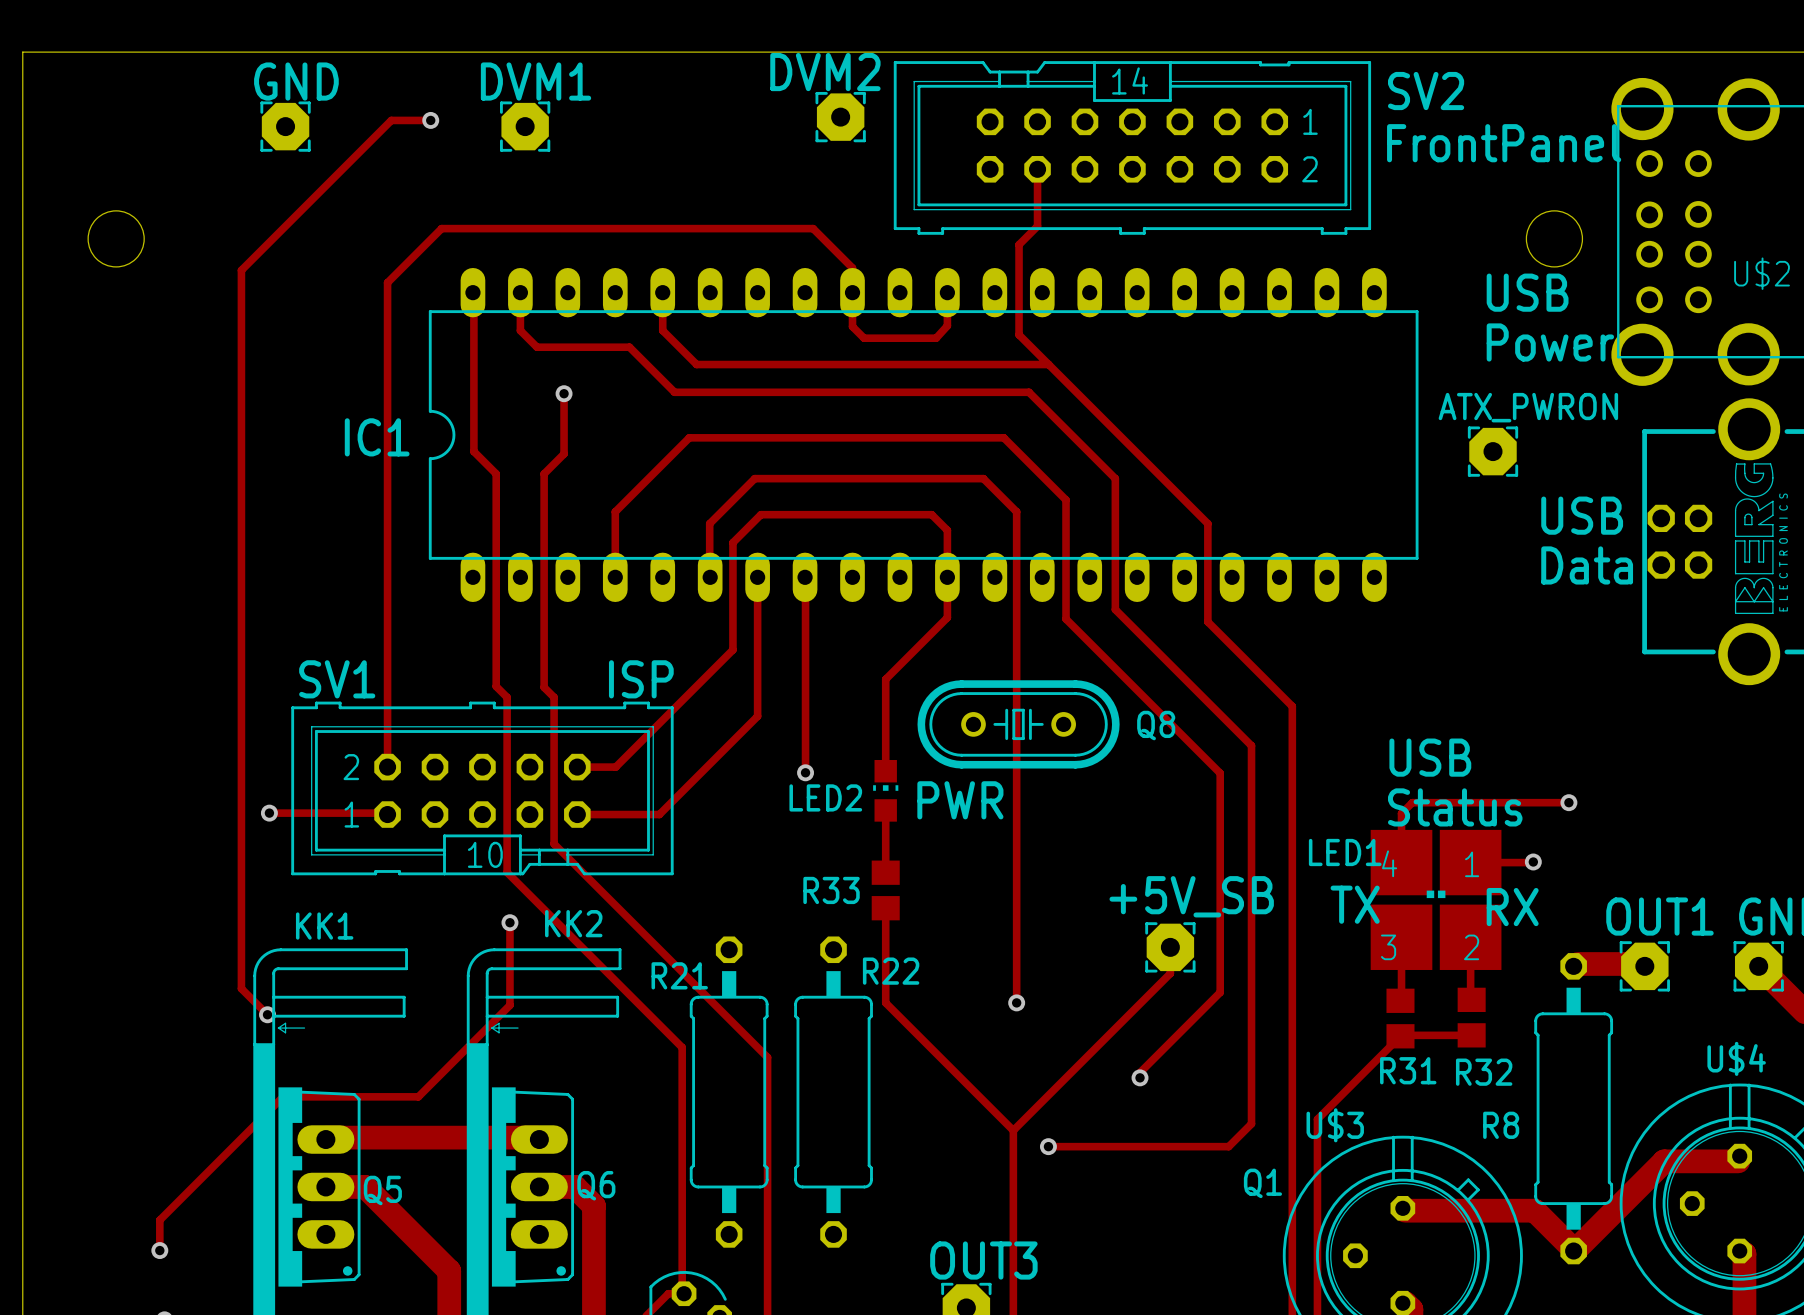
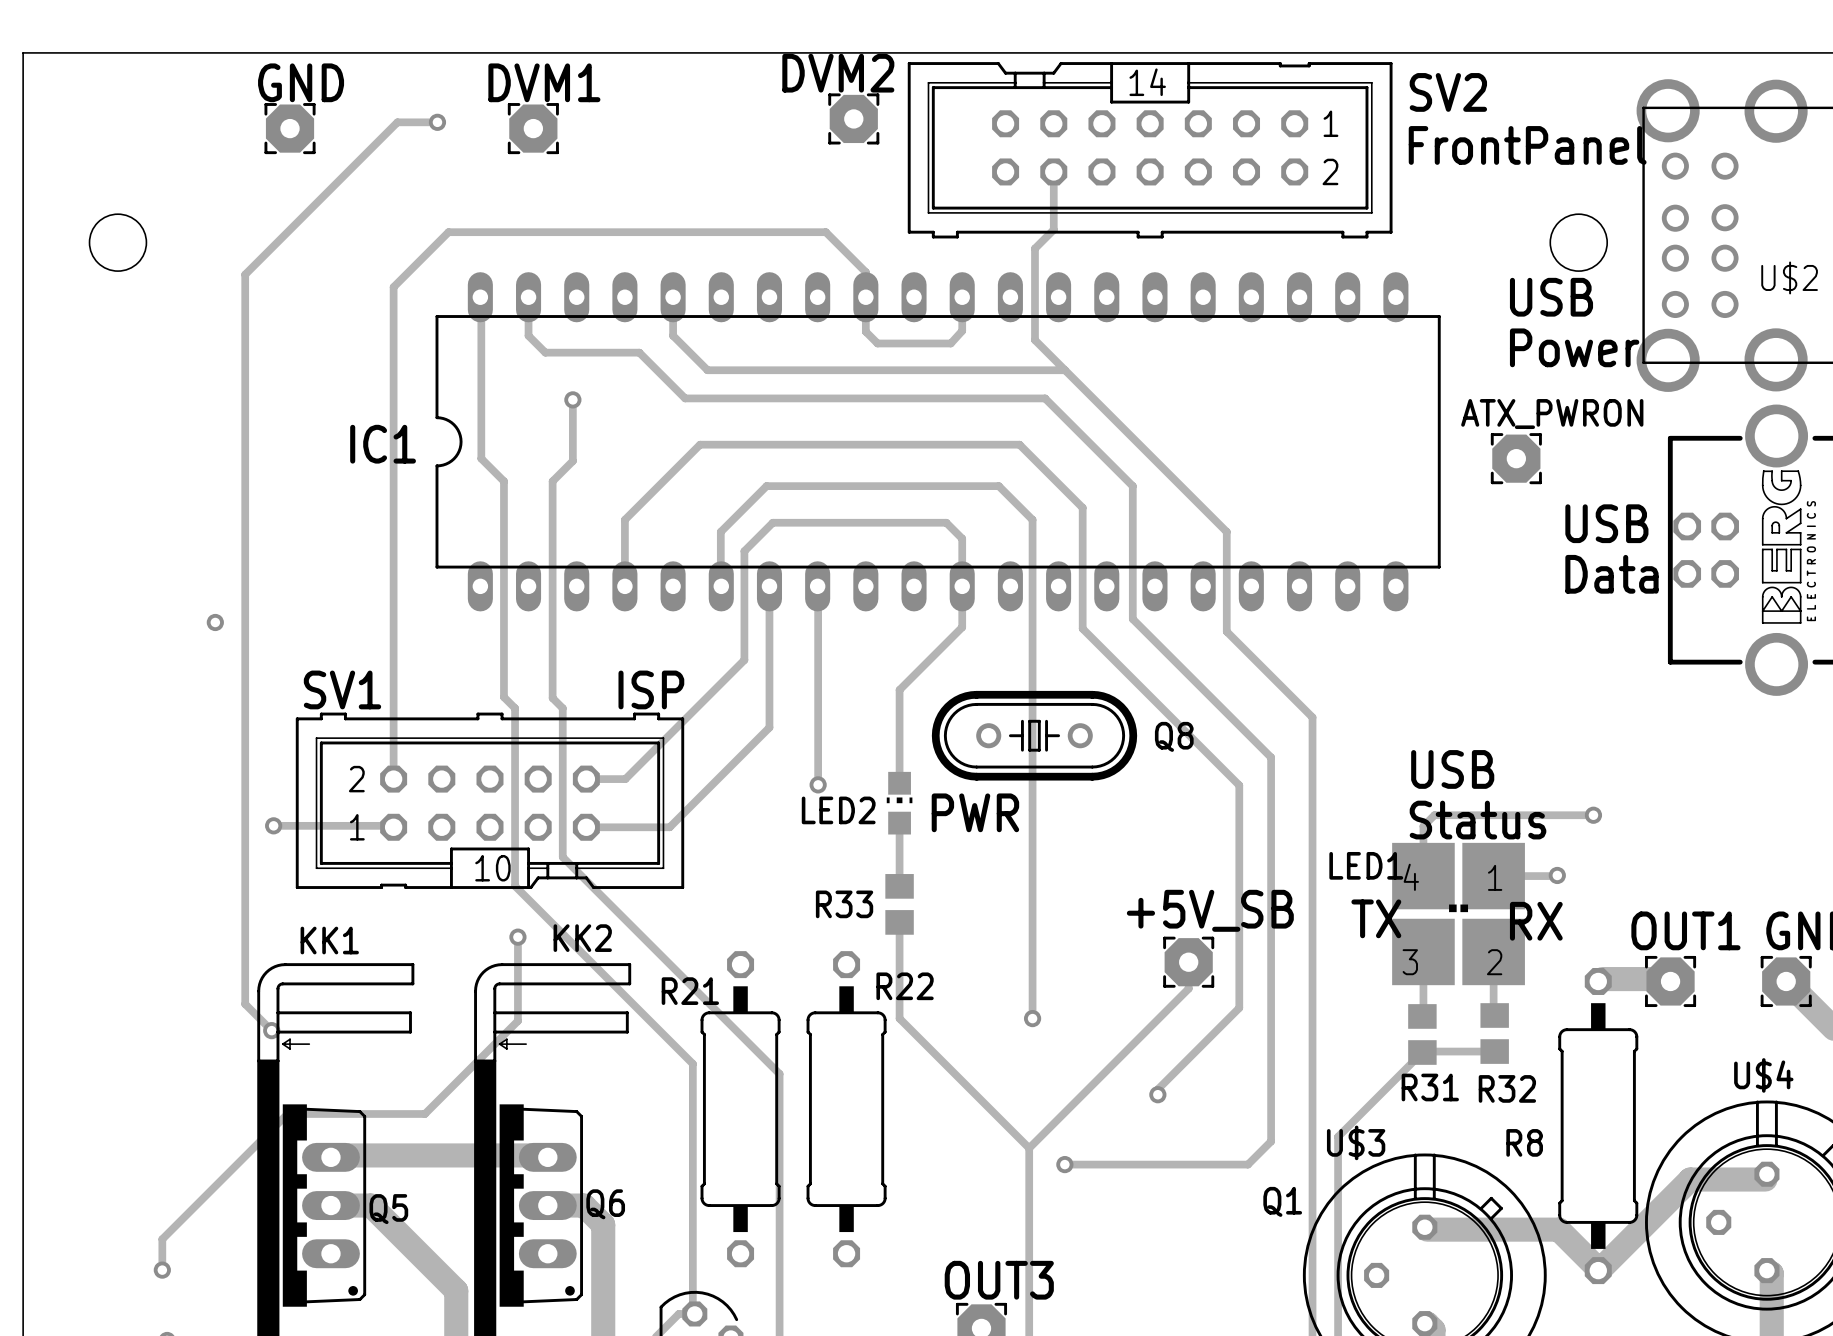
via: none -> (215, 622)

